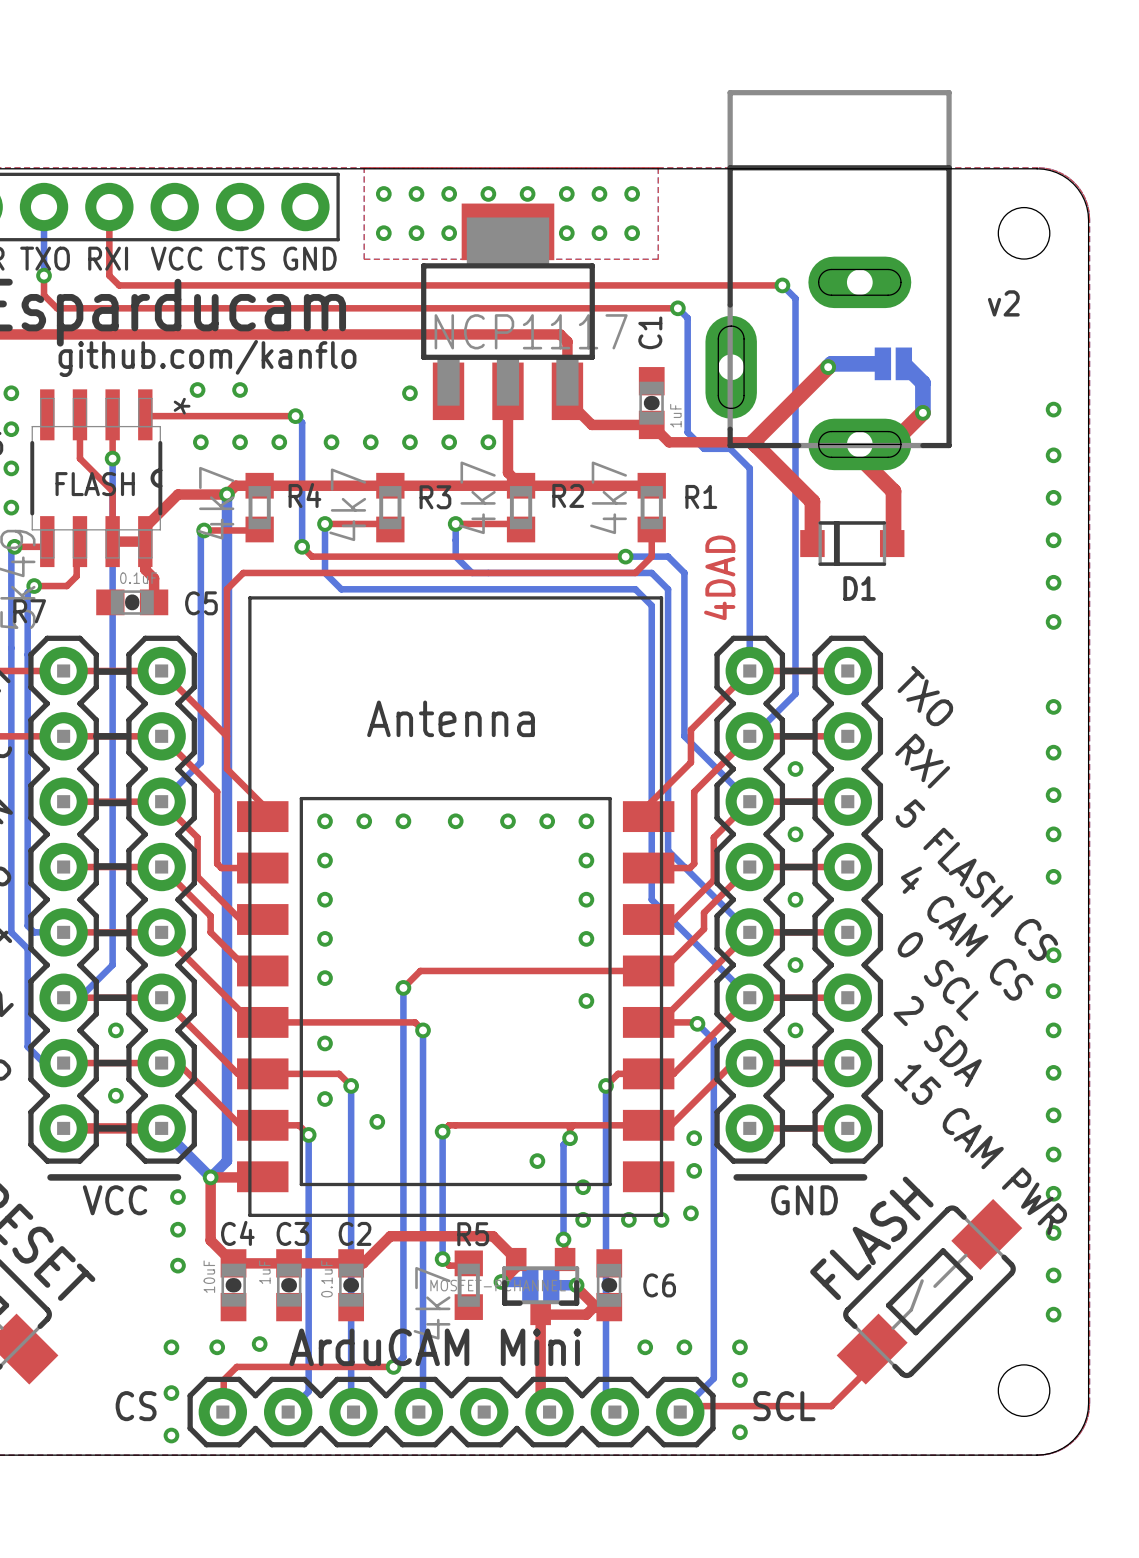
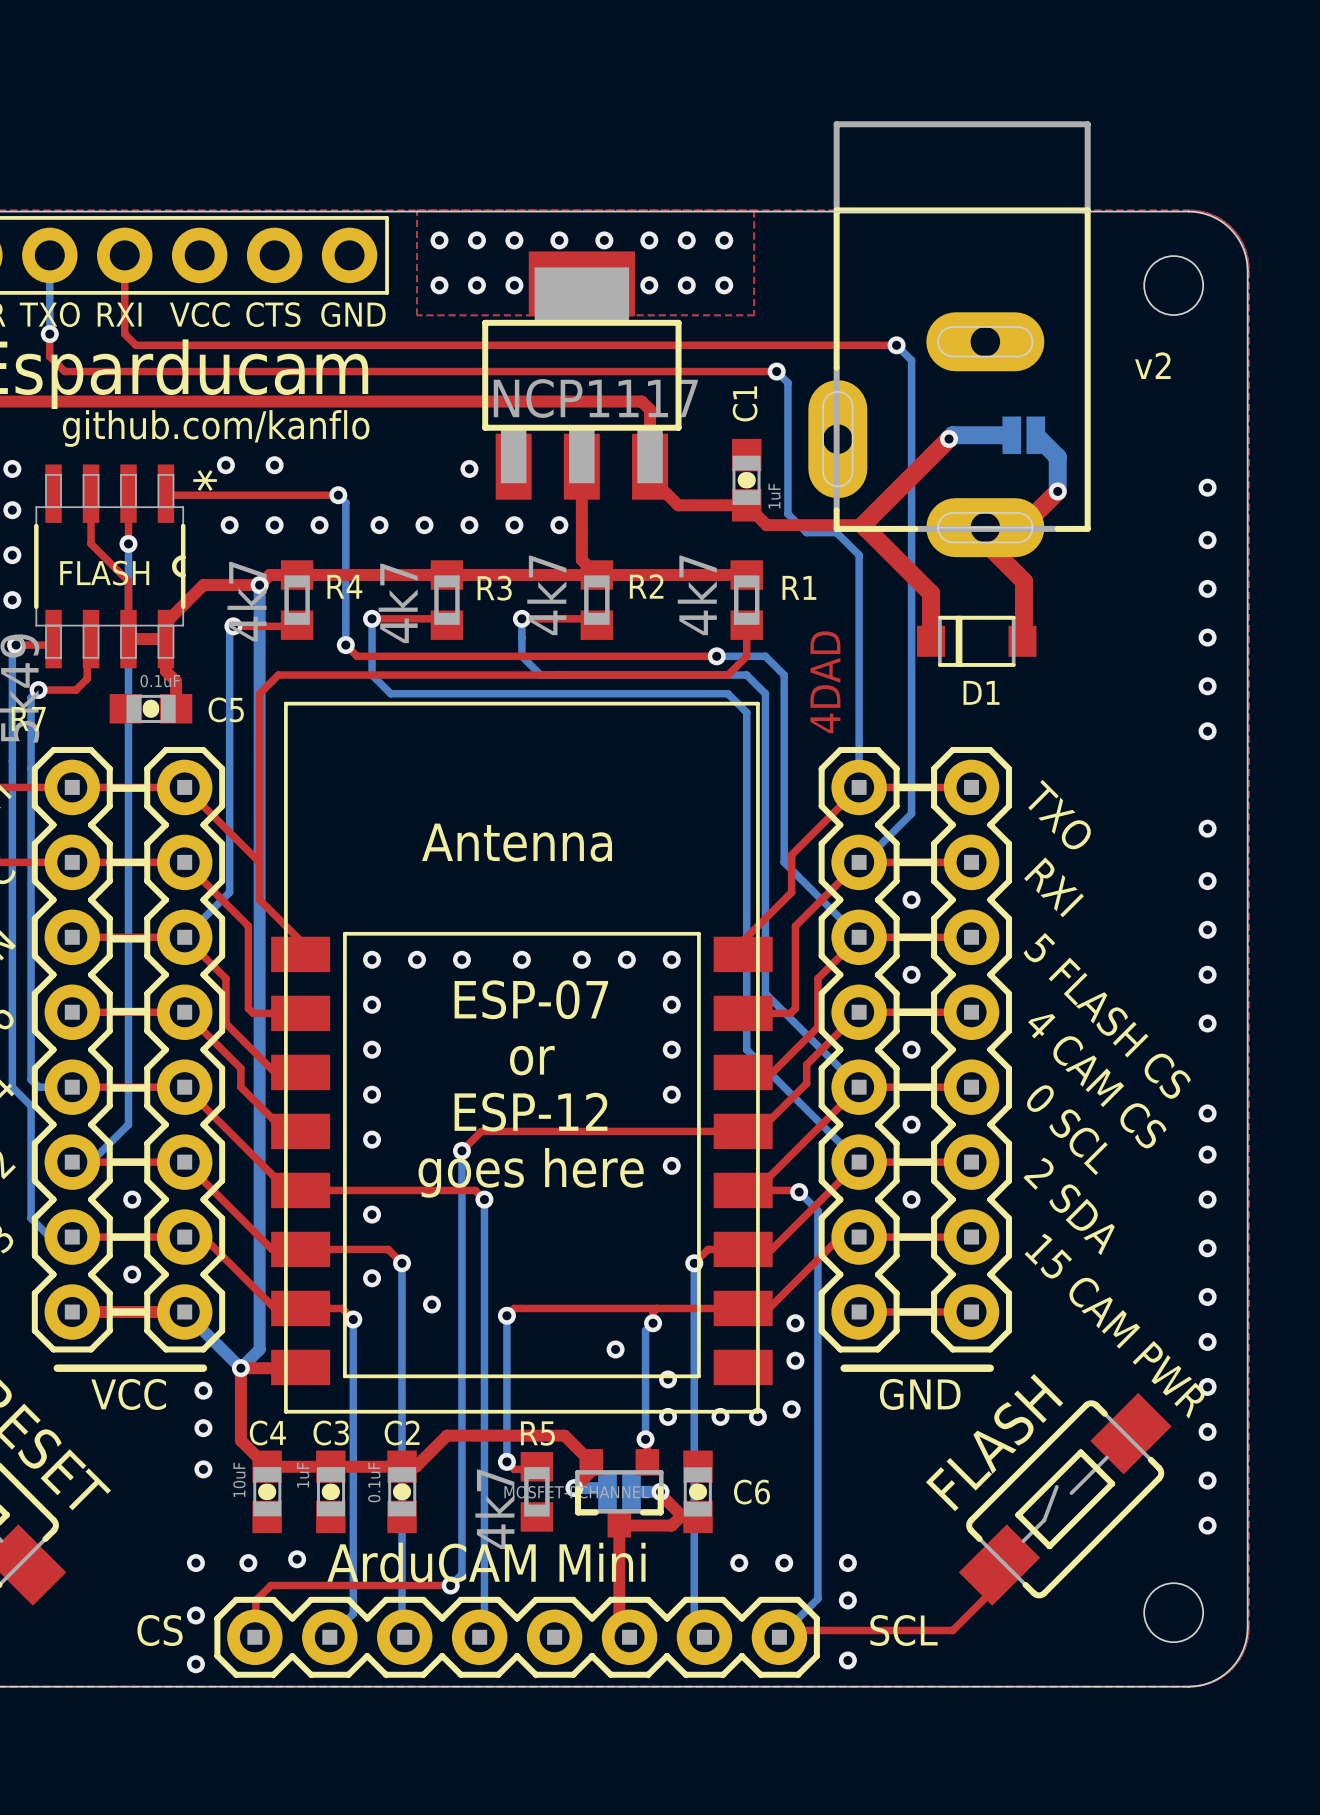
text: none -> ESP-07 (531, 999)
text: none -> or (532, 1060)
text: none -> ESP-12 (531, 1112)
text: none -> goes here (531, 1172)

